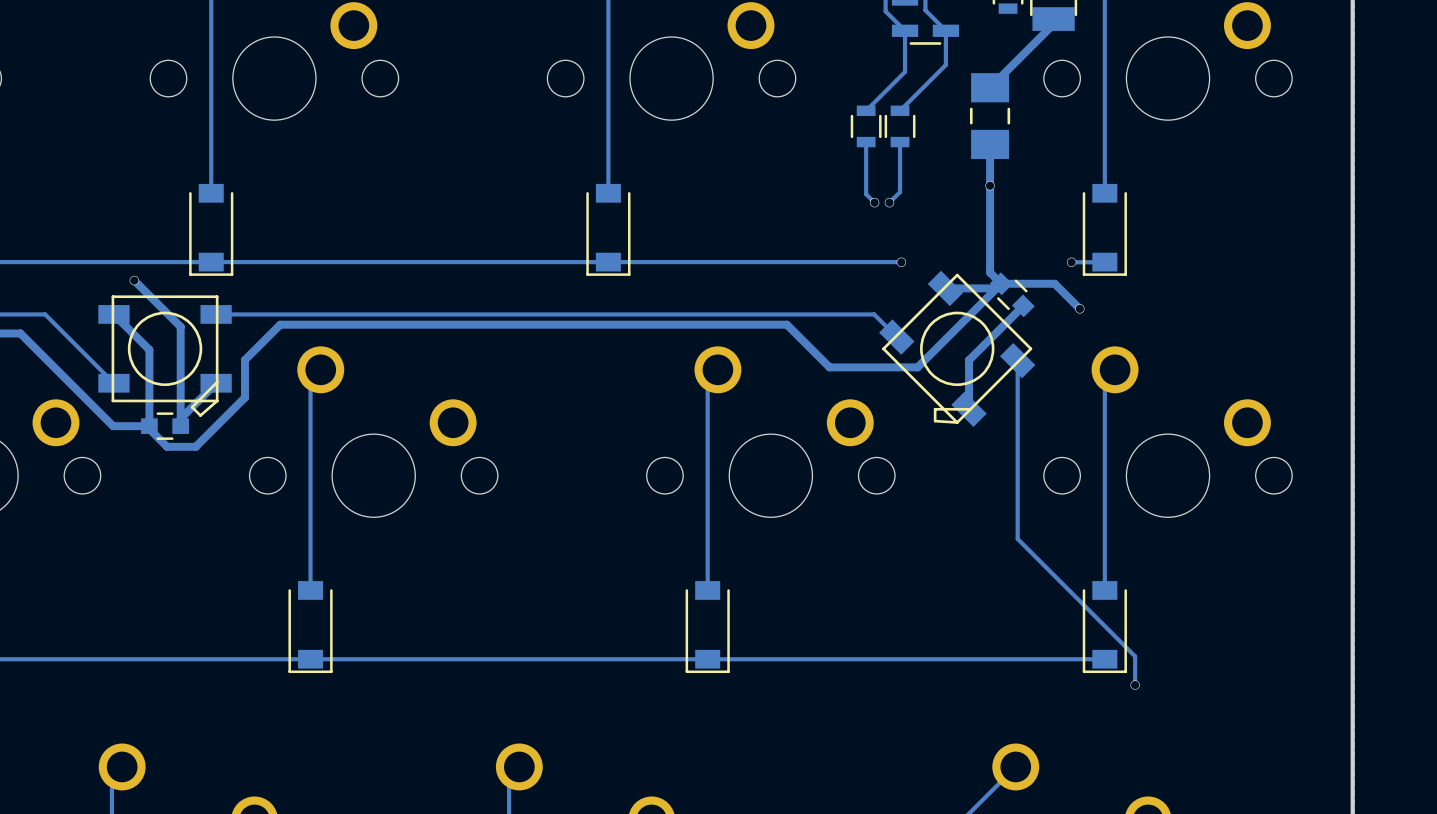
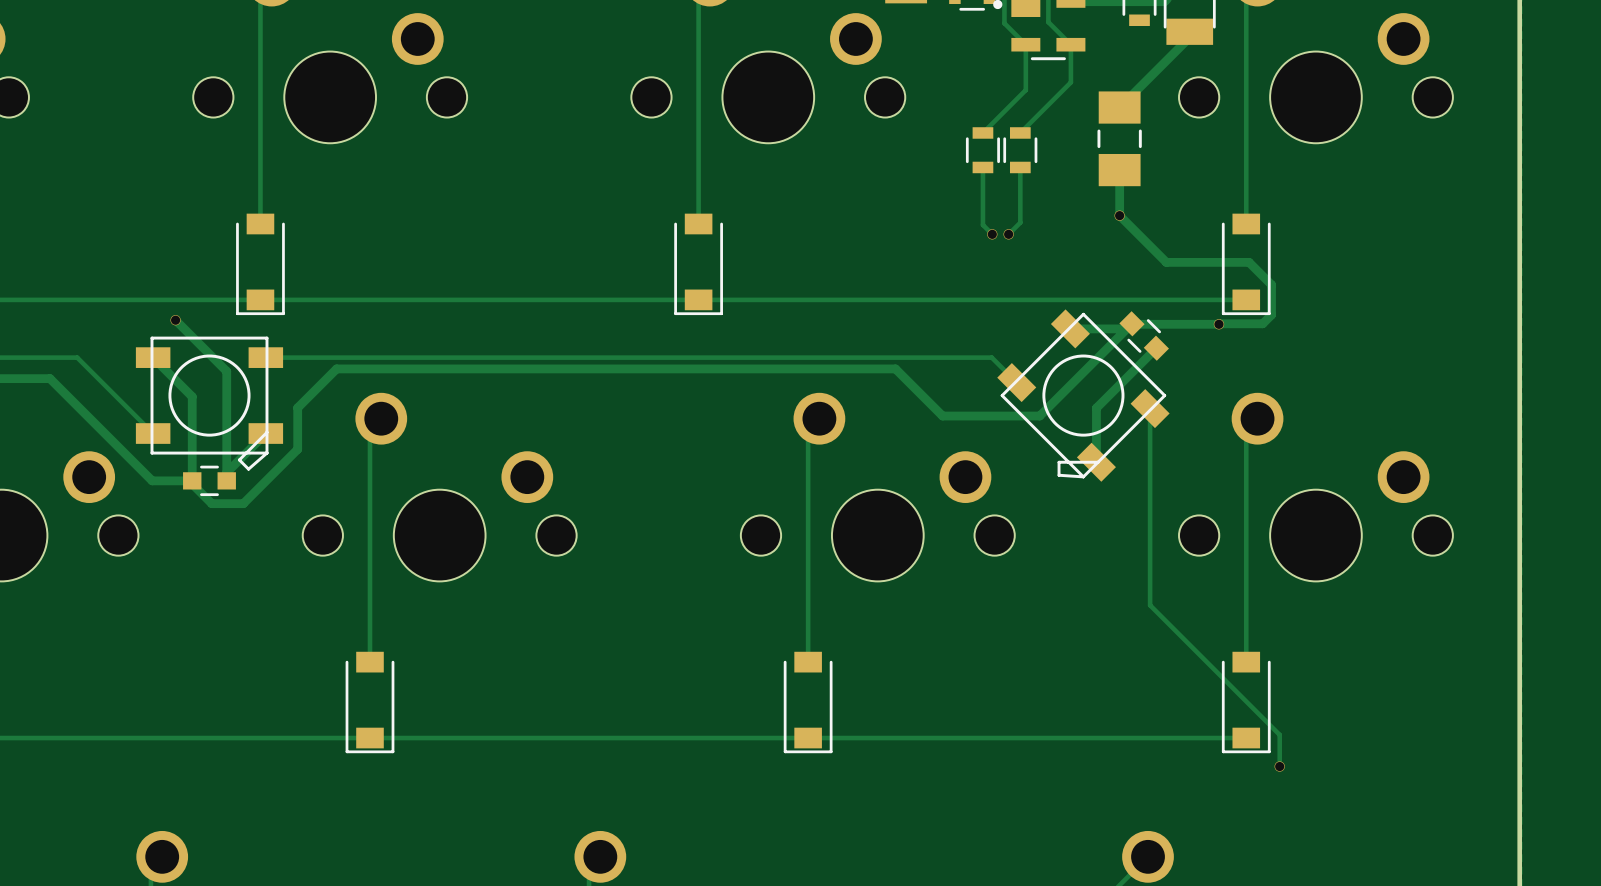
track: (990, 185) (990, 272) (1001, 283) (1054, 283) (1079, 308) -> (1119, 215) (1166, 262) (1249, 262) (1271, 284) (1271, 314) (1262, 323) (1132, 324)
via: (901, 262) -> none
via: (1071, 262) -> none
track: (1104, 262) (1071, 262) -> (1246, 299) (1021, 299)
via: none -> (1218, 324)
via: (1079, 308) -> none

